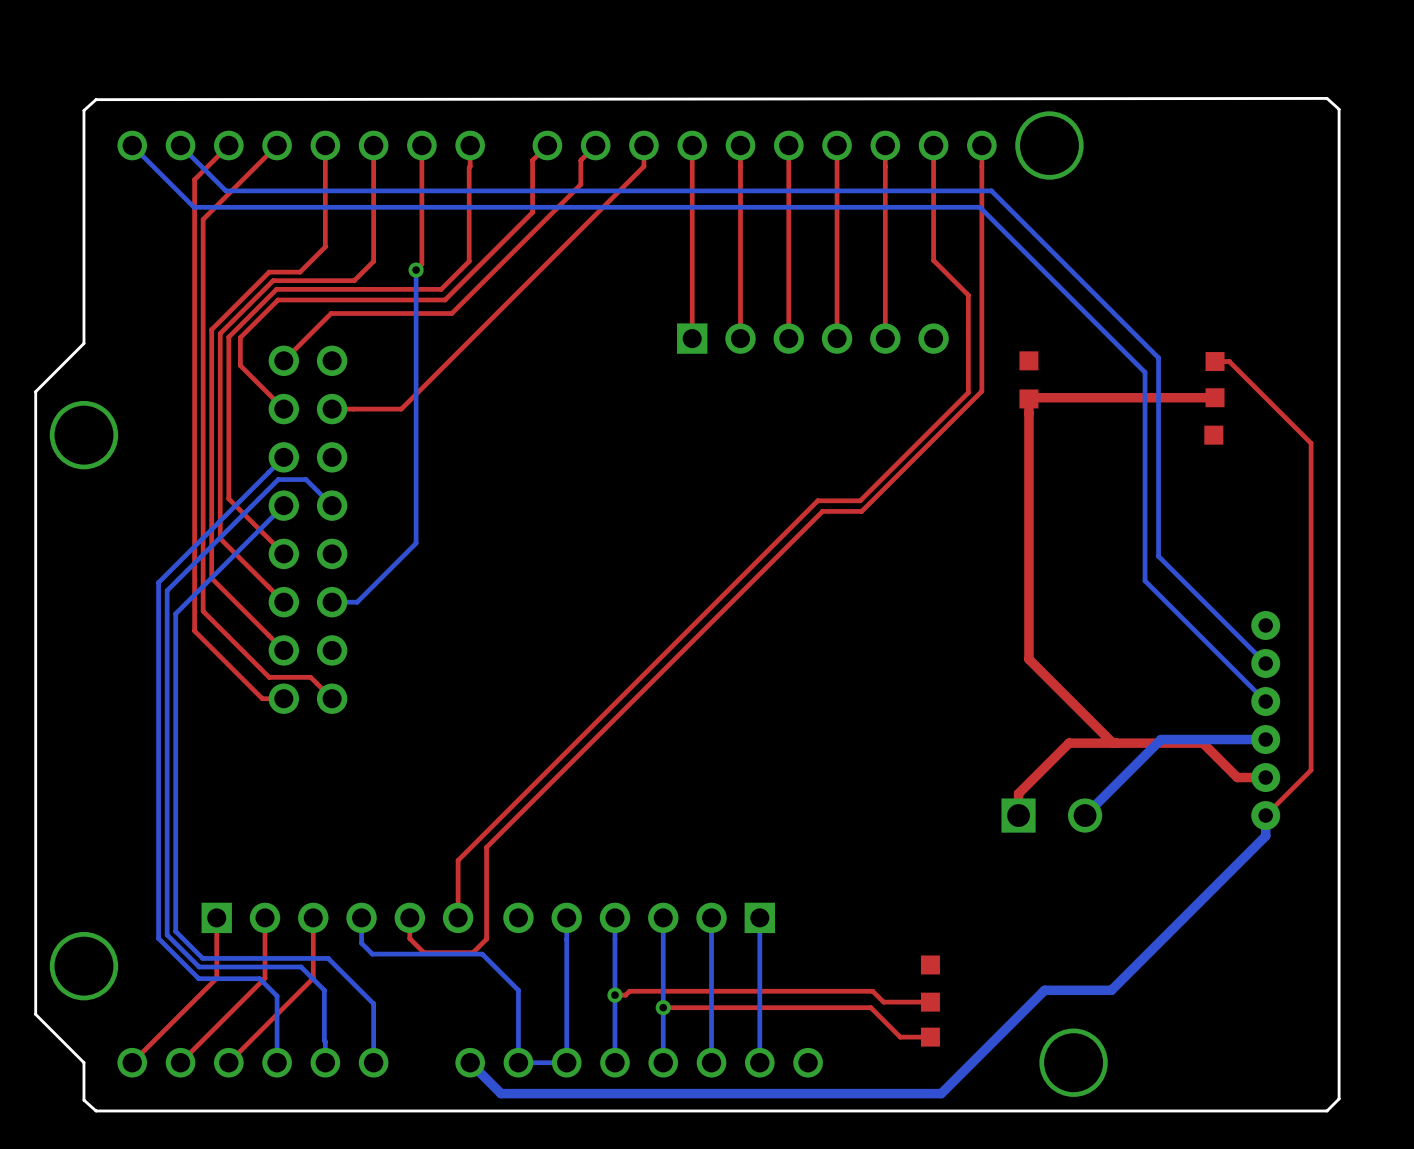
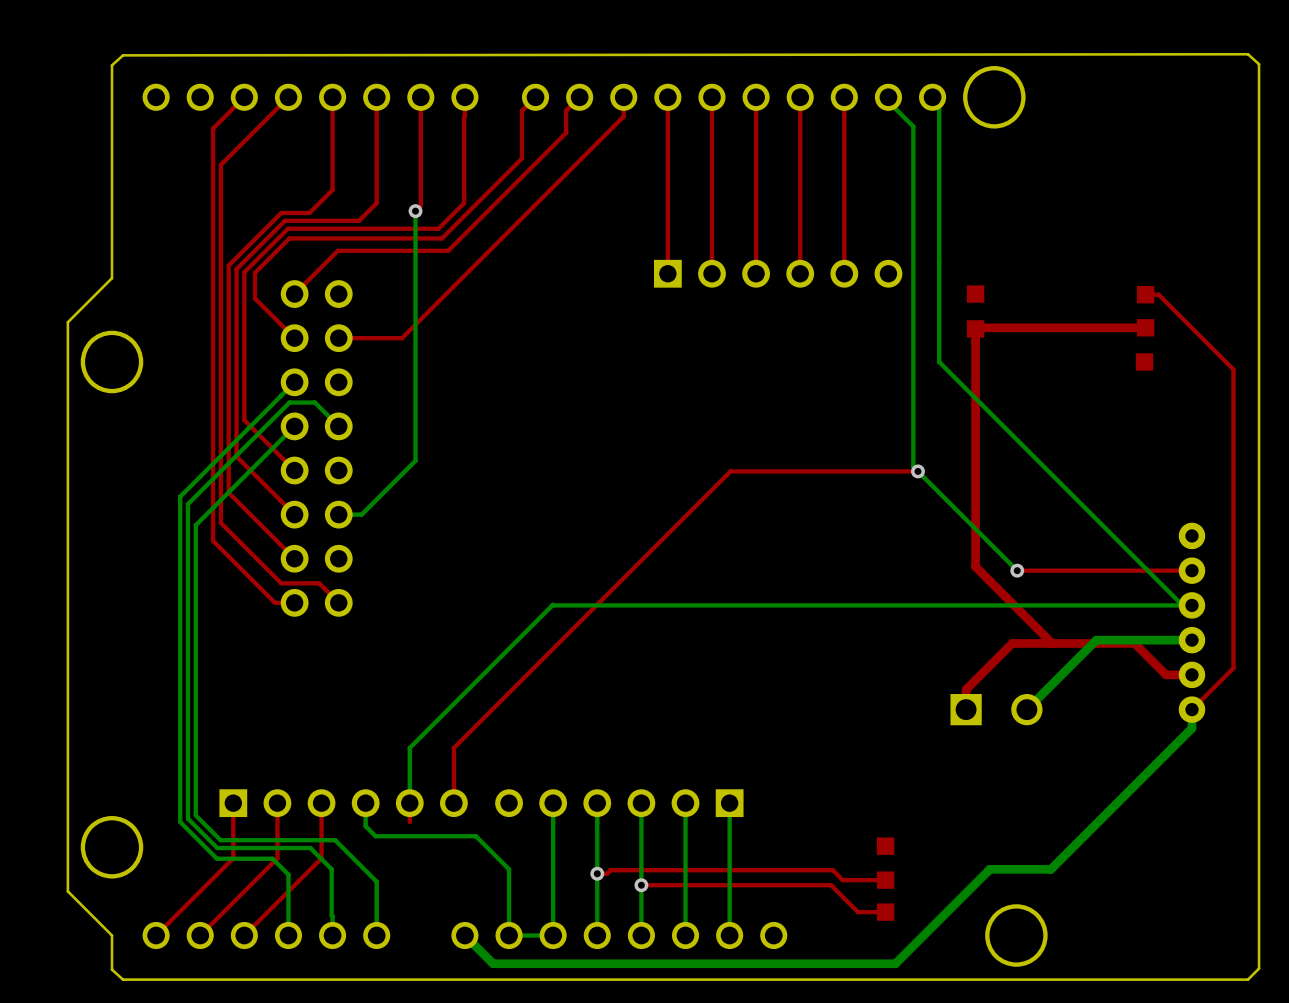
bottom track: (132, 145) (194, 207) (979, 207) (1145, 372) (1145, 580) (1265, 701) -> (552, 605) (1191, 605)
bottom track: (180, 145) (225, 190) (991, 190) (1158, 357) (1158, 556) (1265, 663) -> none
top track: (933, 145) (933, 260) (968, 295) (968, 392) (860, 500) (817, 500) (458, 860) -> (917, 471) (730, 471) (453, 748) (453, 750)
top track: (981, 145) (981, 391) (861, 511) (822, 511) (486, 847) (486, 939) (473, 952) (423, 952) (409, 938) -> none
bottom track: none -> (895, 108) (913, 126) (913, 466) (1017, 570)
bottom track: none -> (939, 108) (939, 361) (1181, 604)
via: none -> (917, 471)
via: none -> (1017, 570)
top track: none -> (1191, 570) (1017, 570)
bottom track: none -> (553, 604) (409, 748) (409, 803)

